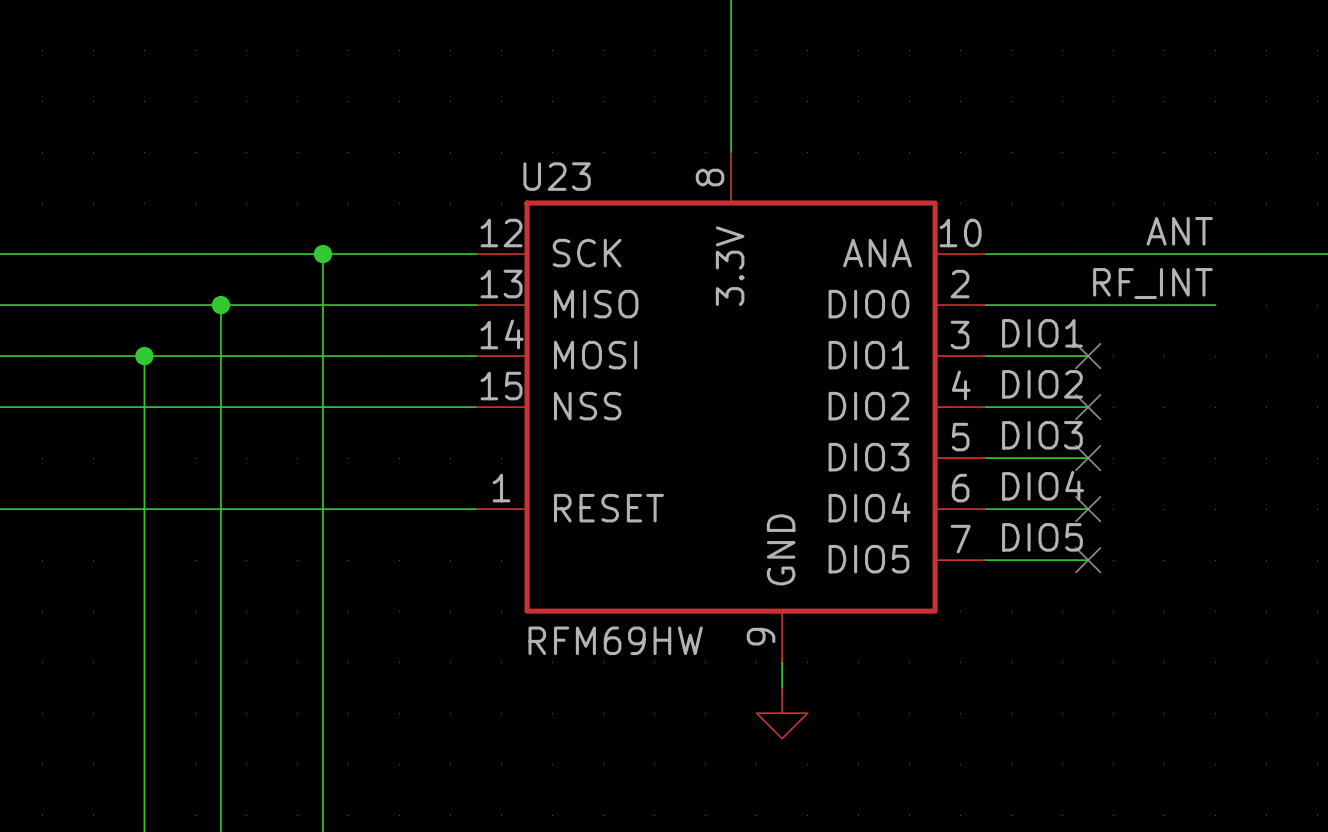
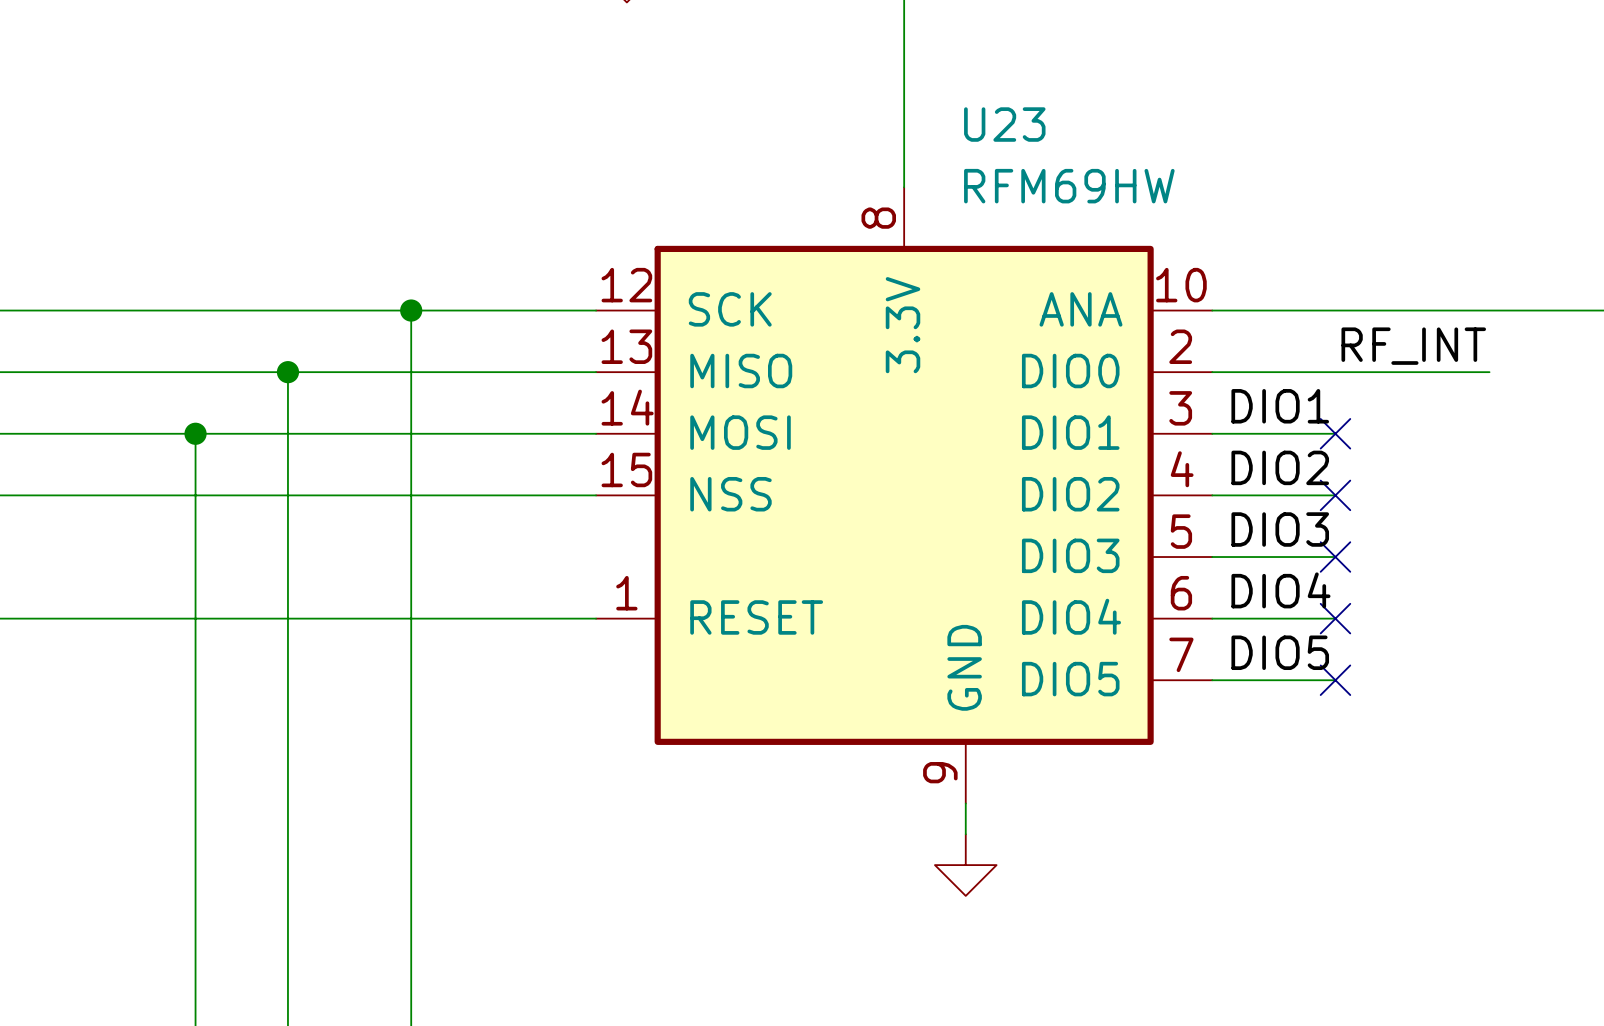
U23 name position: U23 (557, 176) -> U23 (1004, 124)
label: ANT (1179, 231) -> none
U23 value position: RFM69HW (615, 640) -> RFM69HW (1069, 186)

